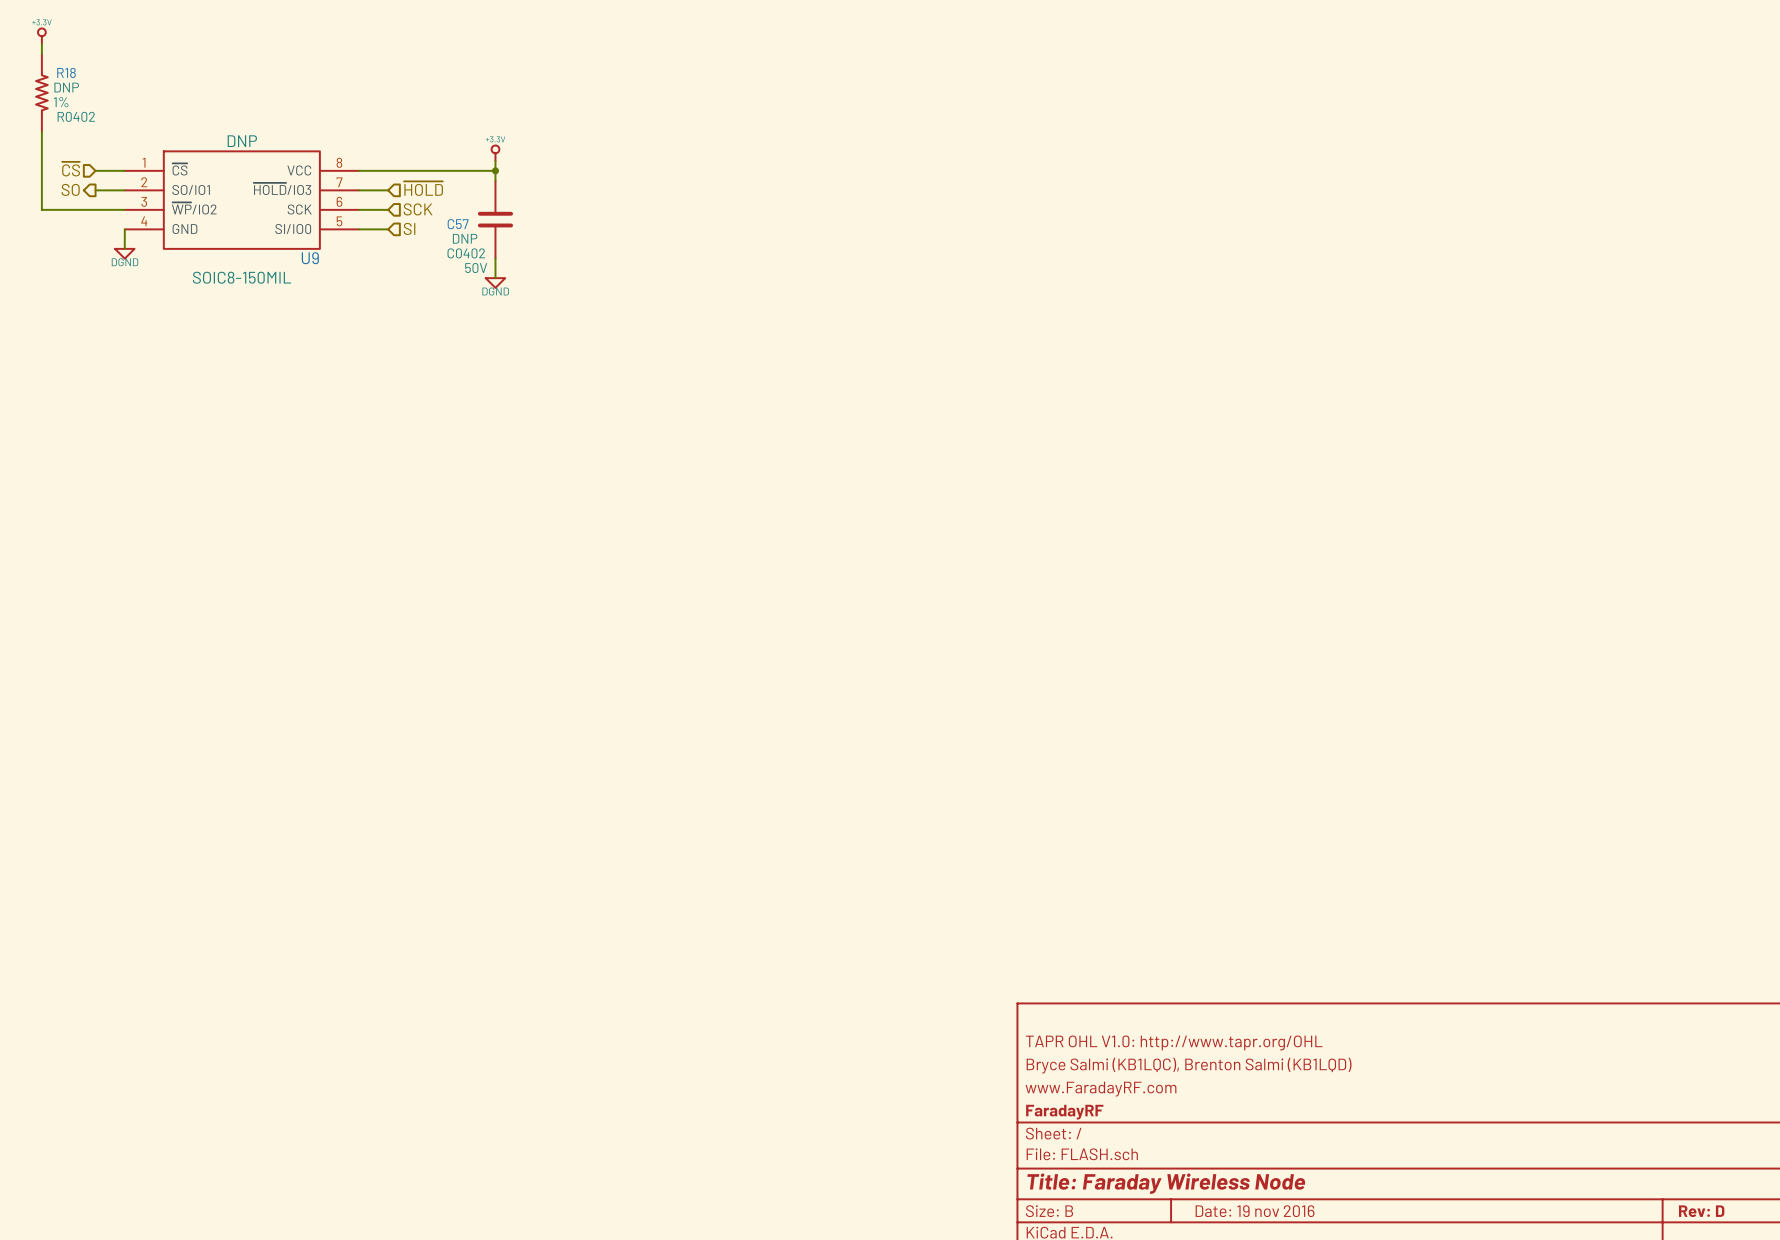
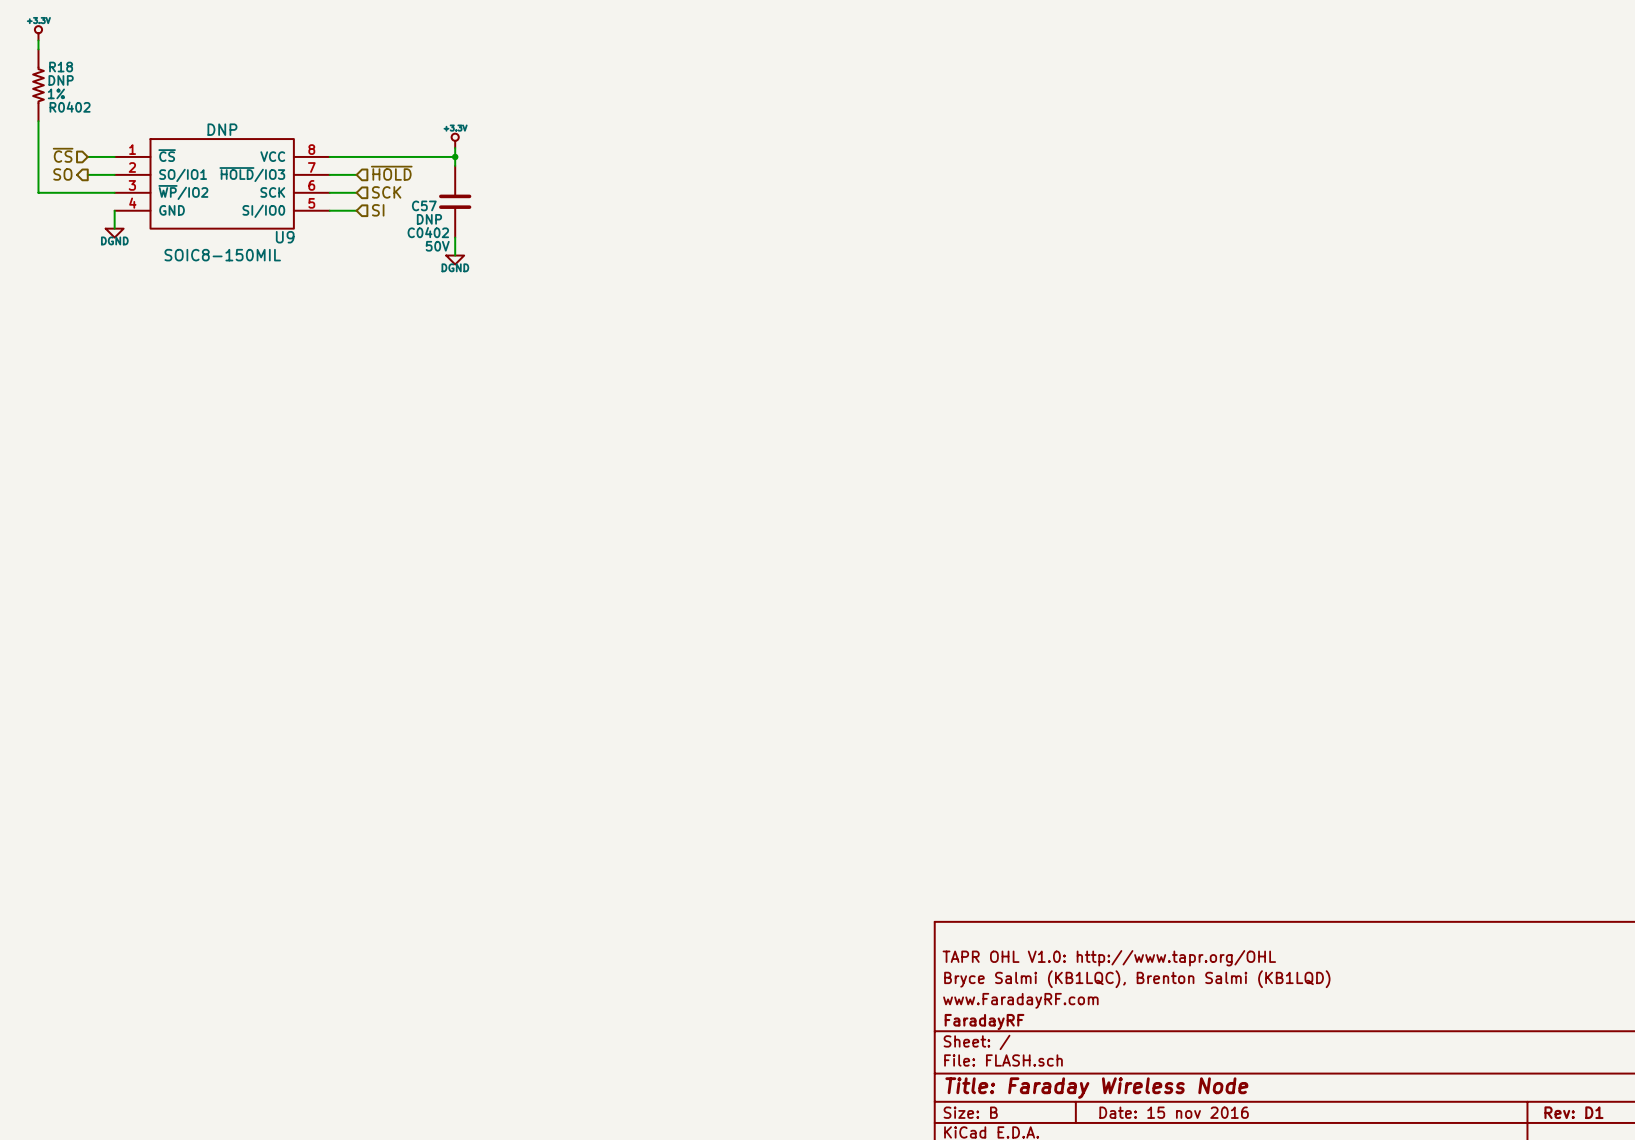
title block: Date: 19 nov 2016 (1255, 1211) -> Date: 15 nov 2016 (1174, 1112)
title block: Rev: D (1701, 1211) -> Rev: D1 (1573, 1112)

